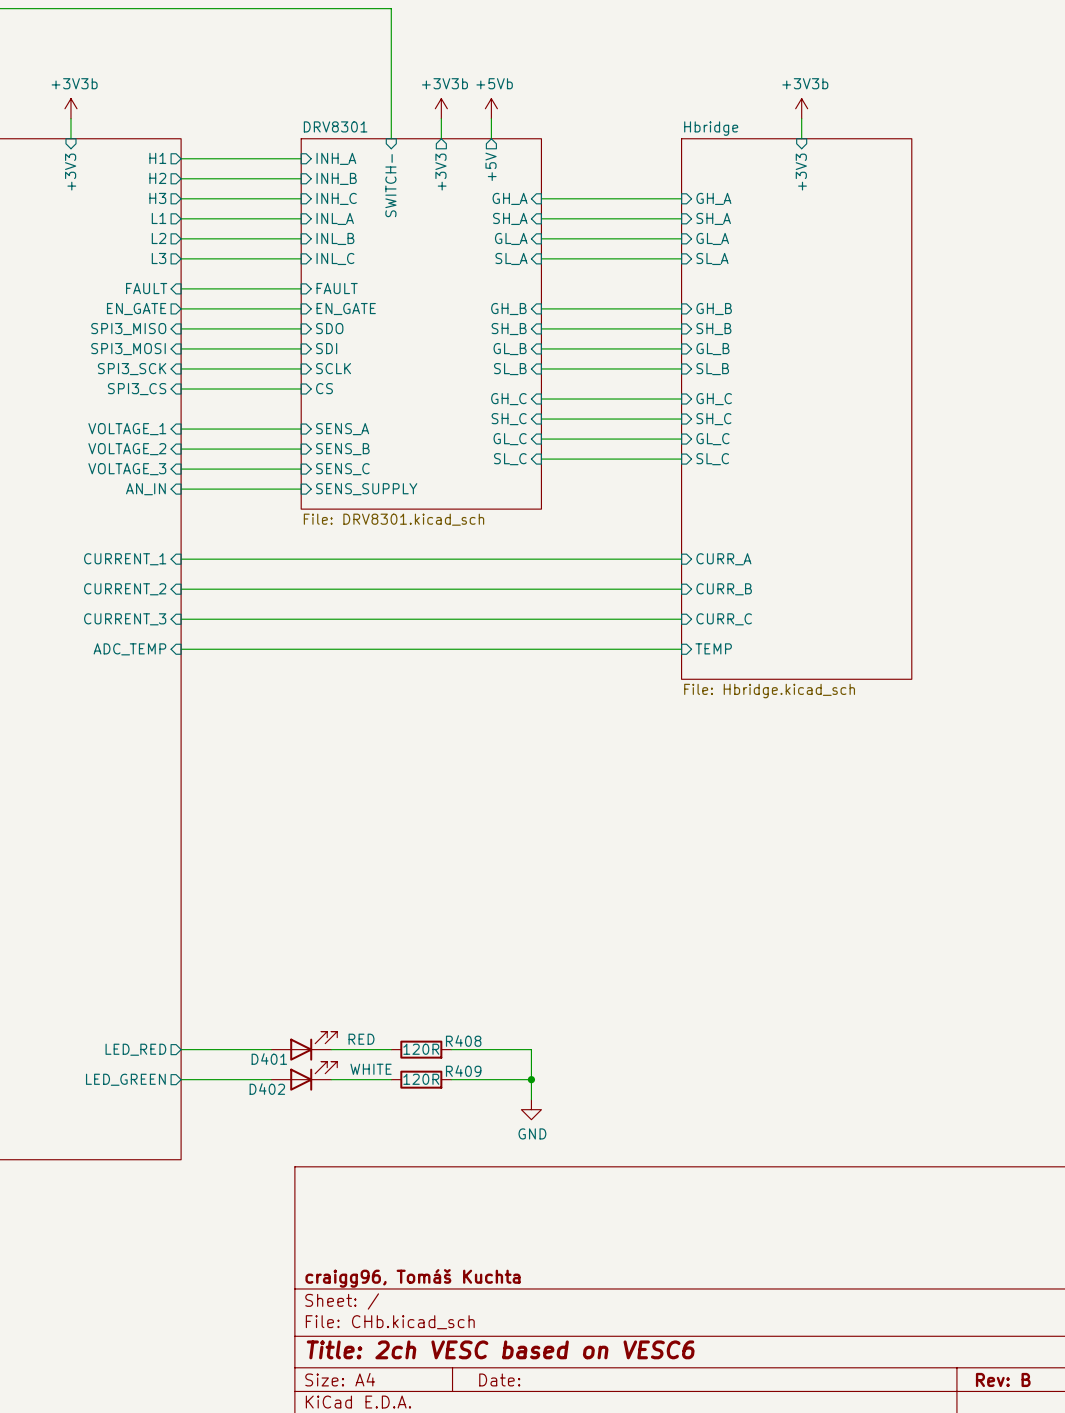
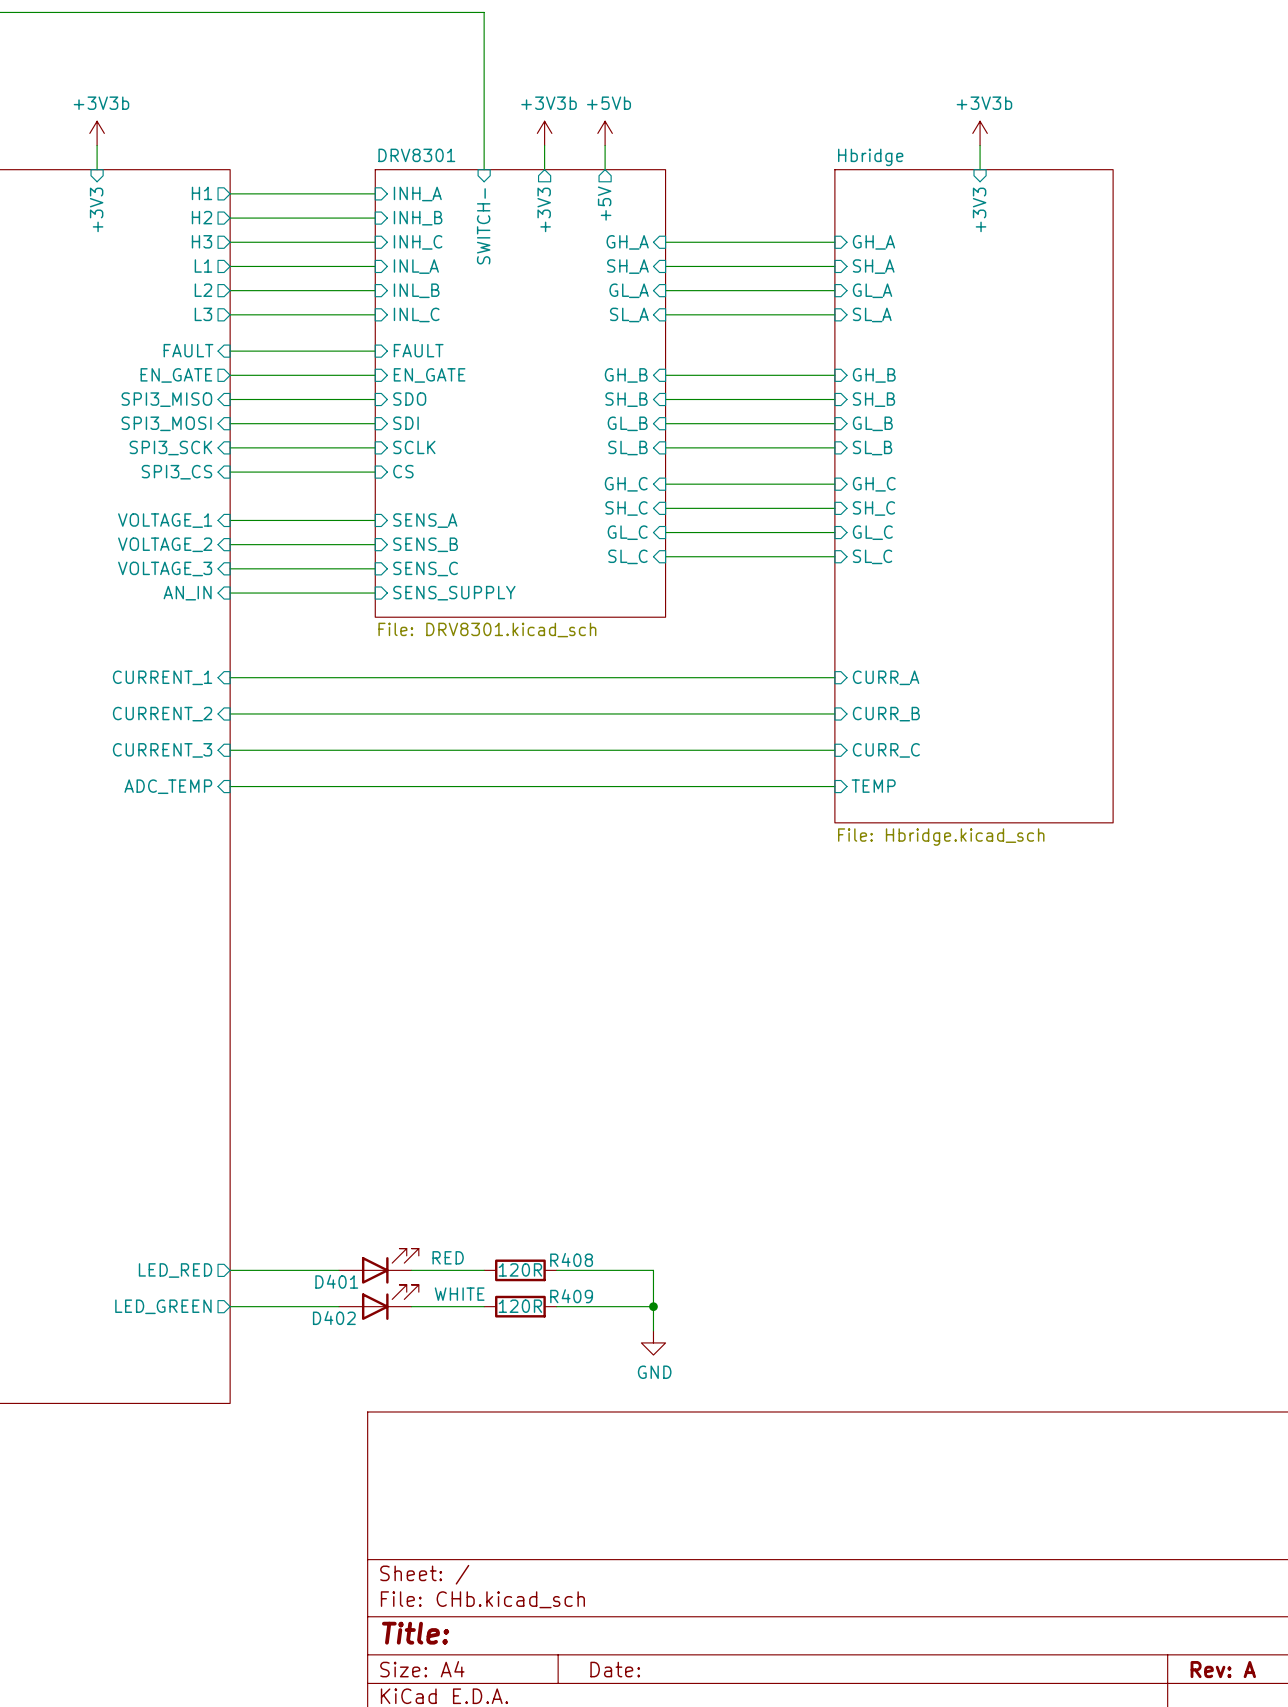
title block: craigg96, Tomáš Kuchta (412, 1278) -> none
title block: Title: 2ch VESC based on VESC6 (500, 1349) -> Title: (415, 1633)
title block: Rev: B (1003, 1379) -> Rev: A (1223, 1669)

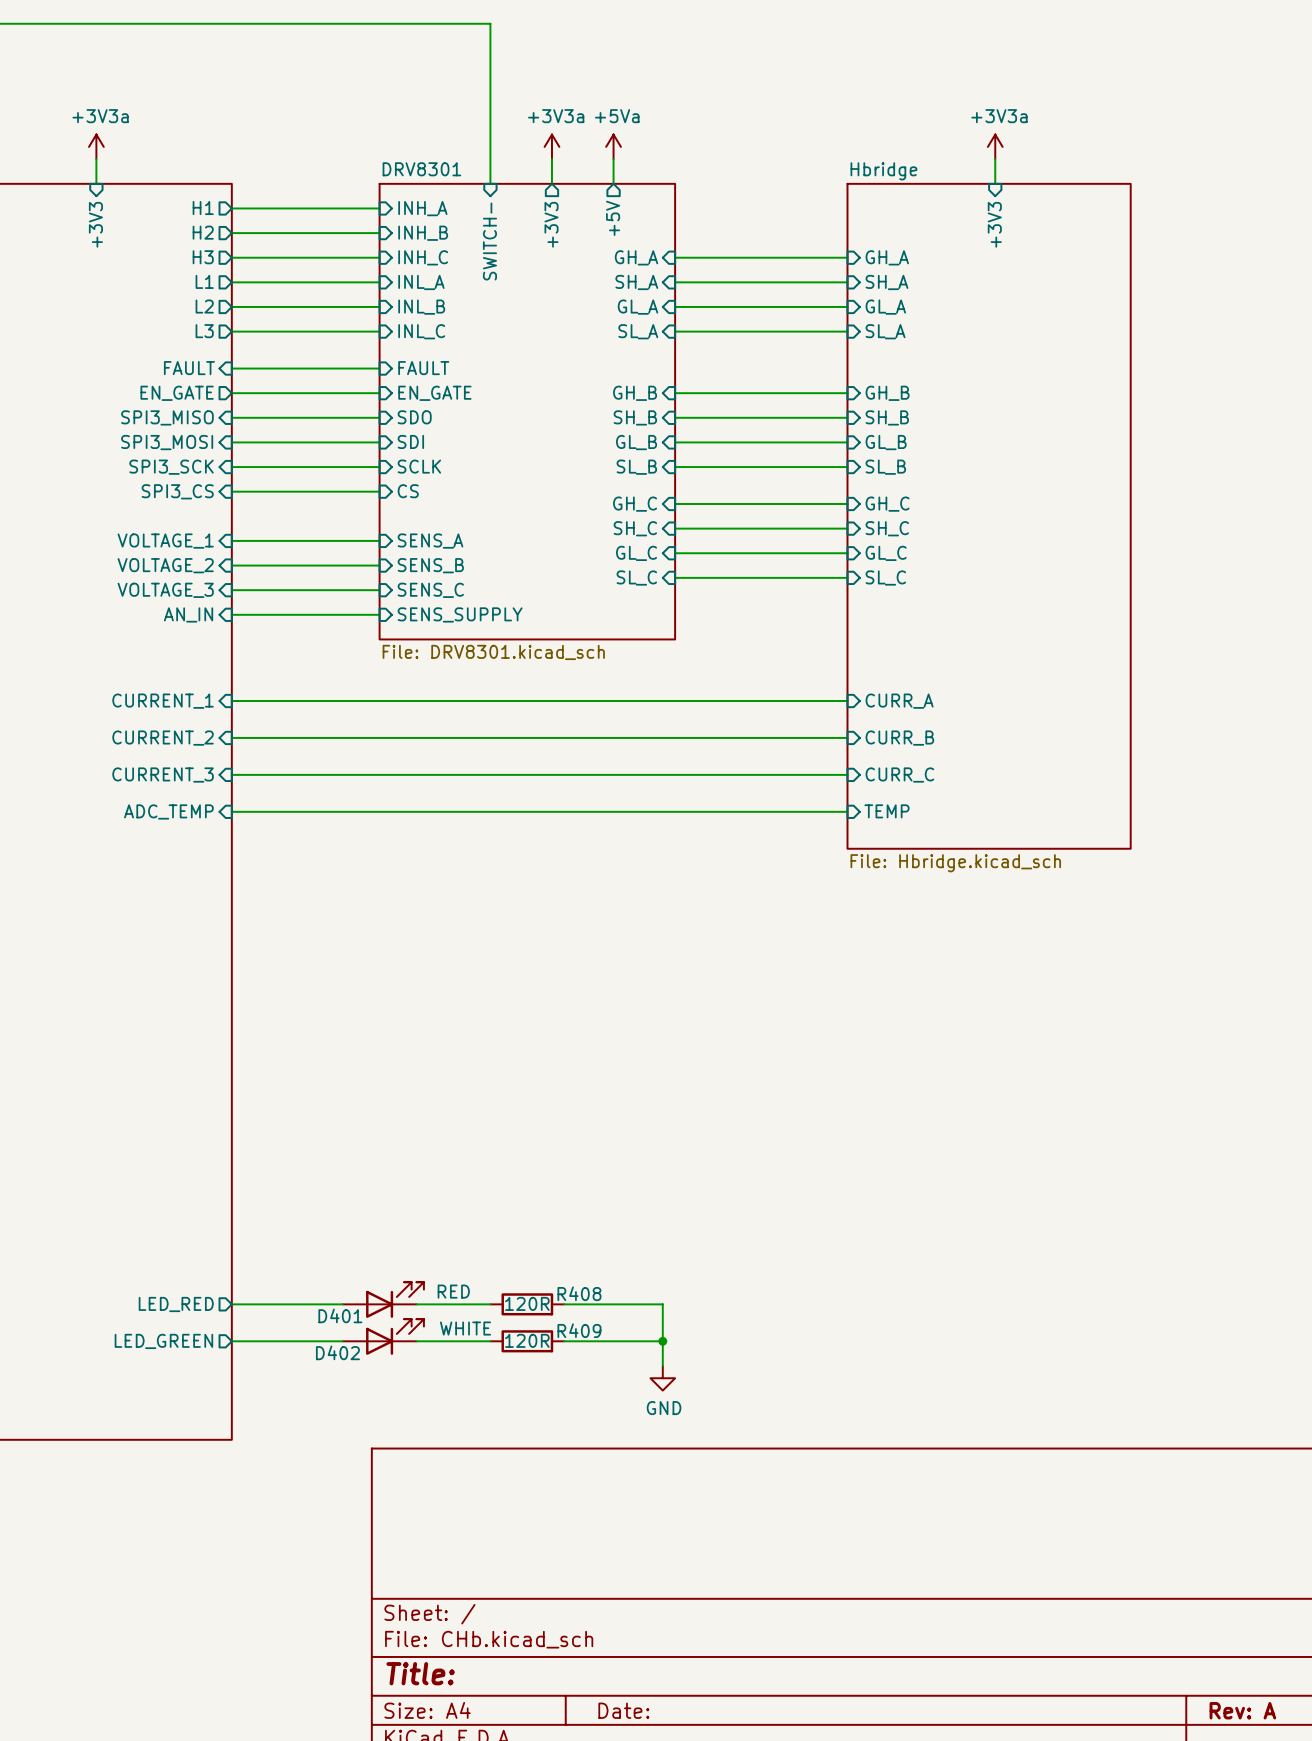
power symbol: +3V3b (97, 133) -> +3V3a (96, 146)
power symbol: +3V3b (544, 133) -> +3V3a (551, 146)
power symbol: +5Vb (605, 133) -> +5Va (613, 146)
power symbol: +3V3b (980, 133) -> +3V3a (995, 146)

